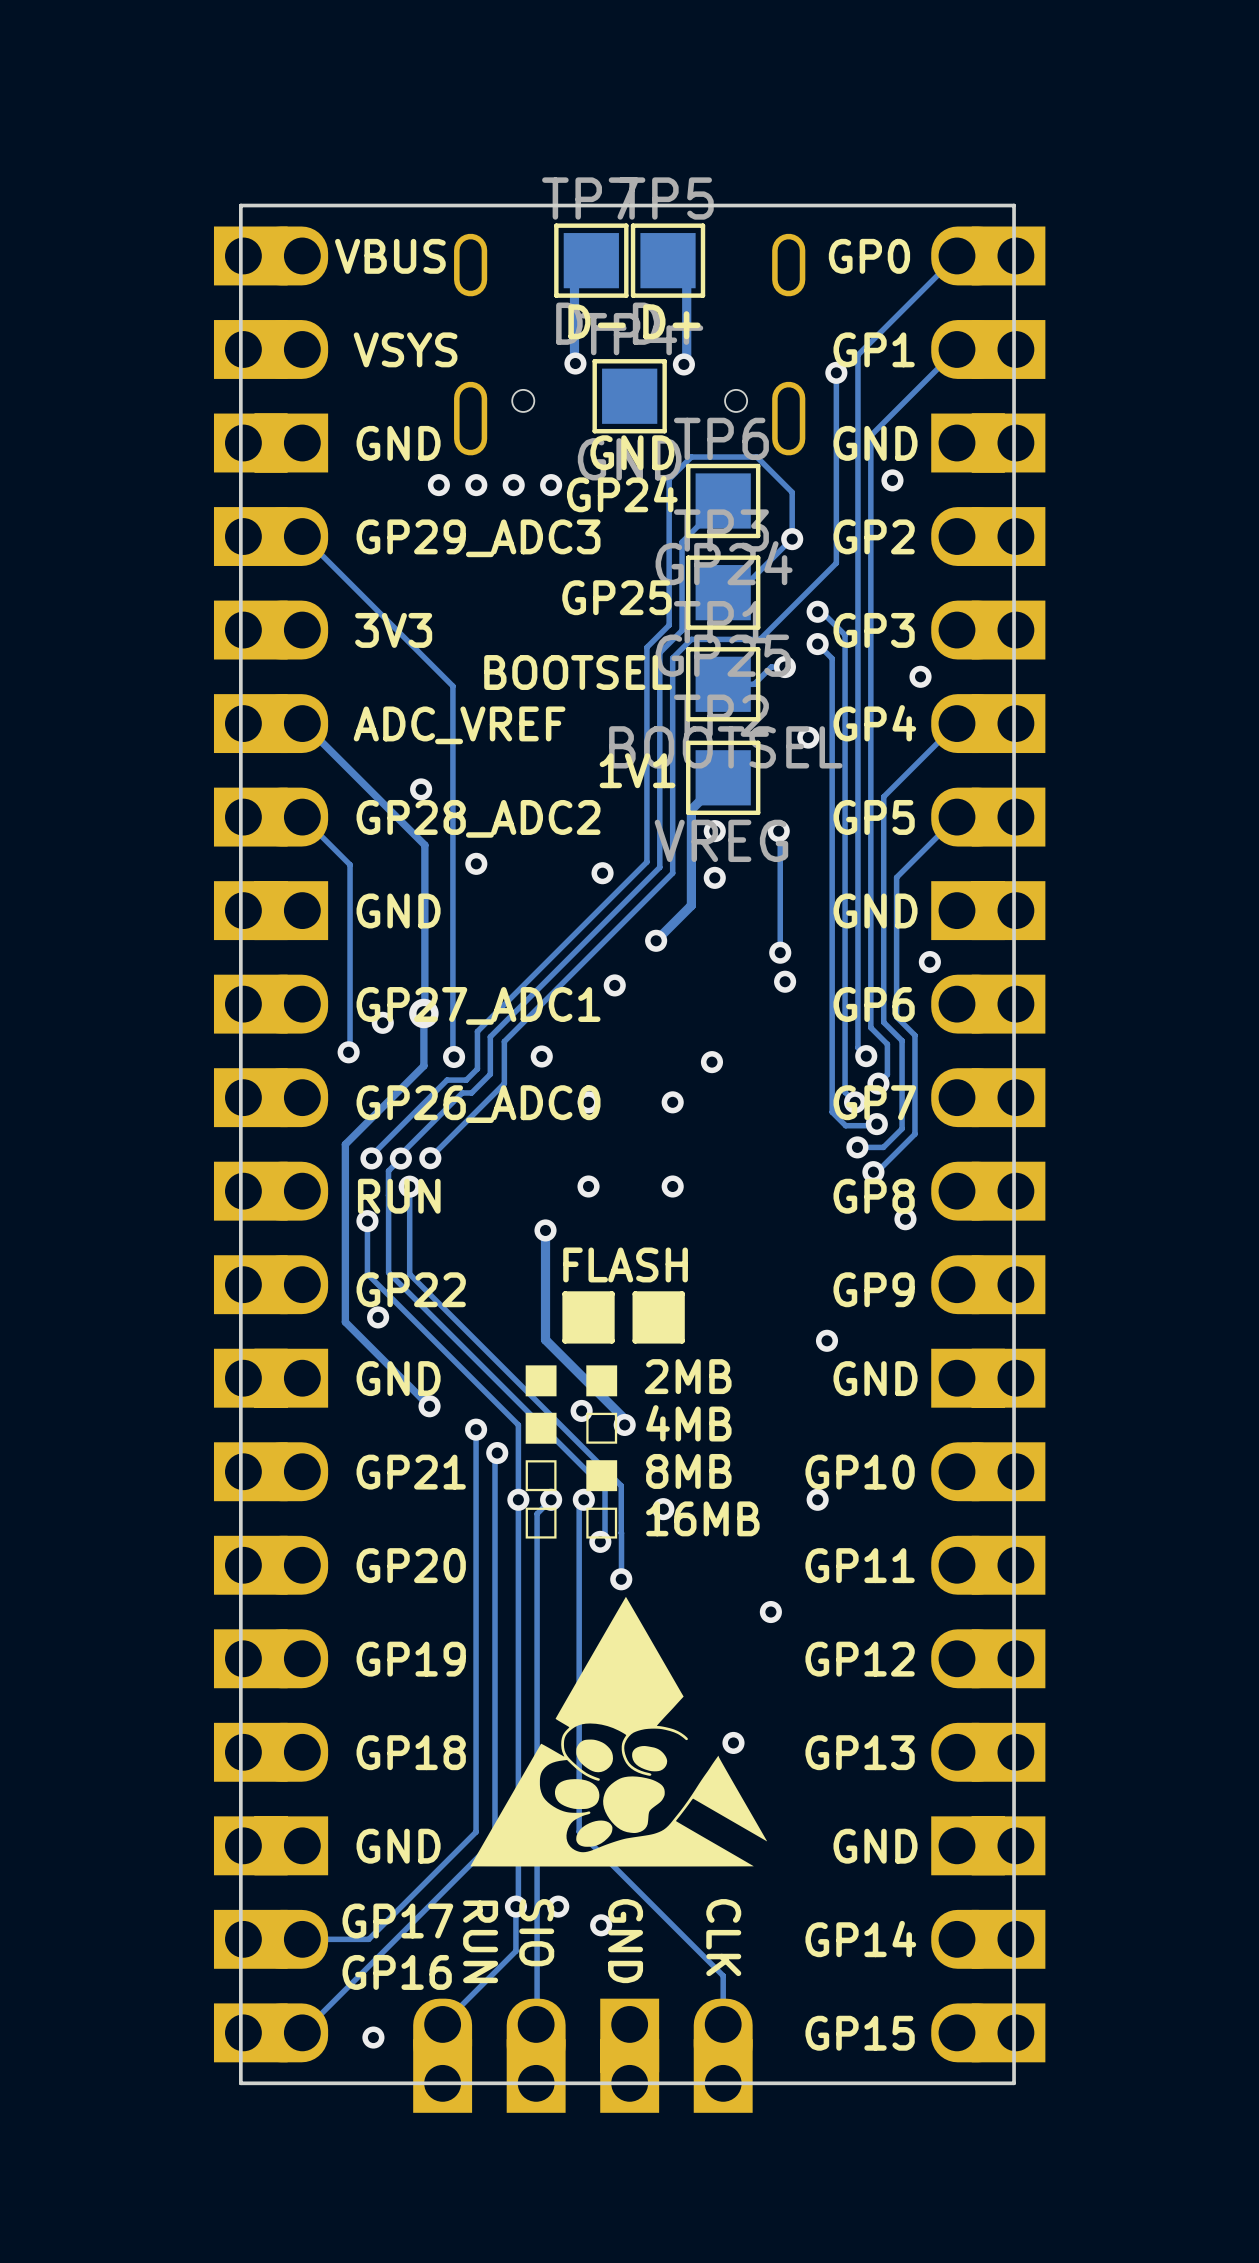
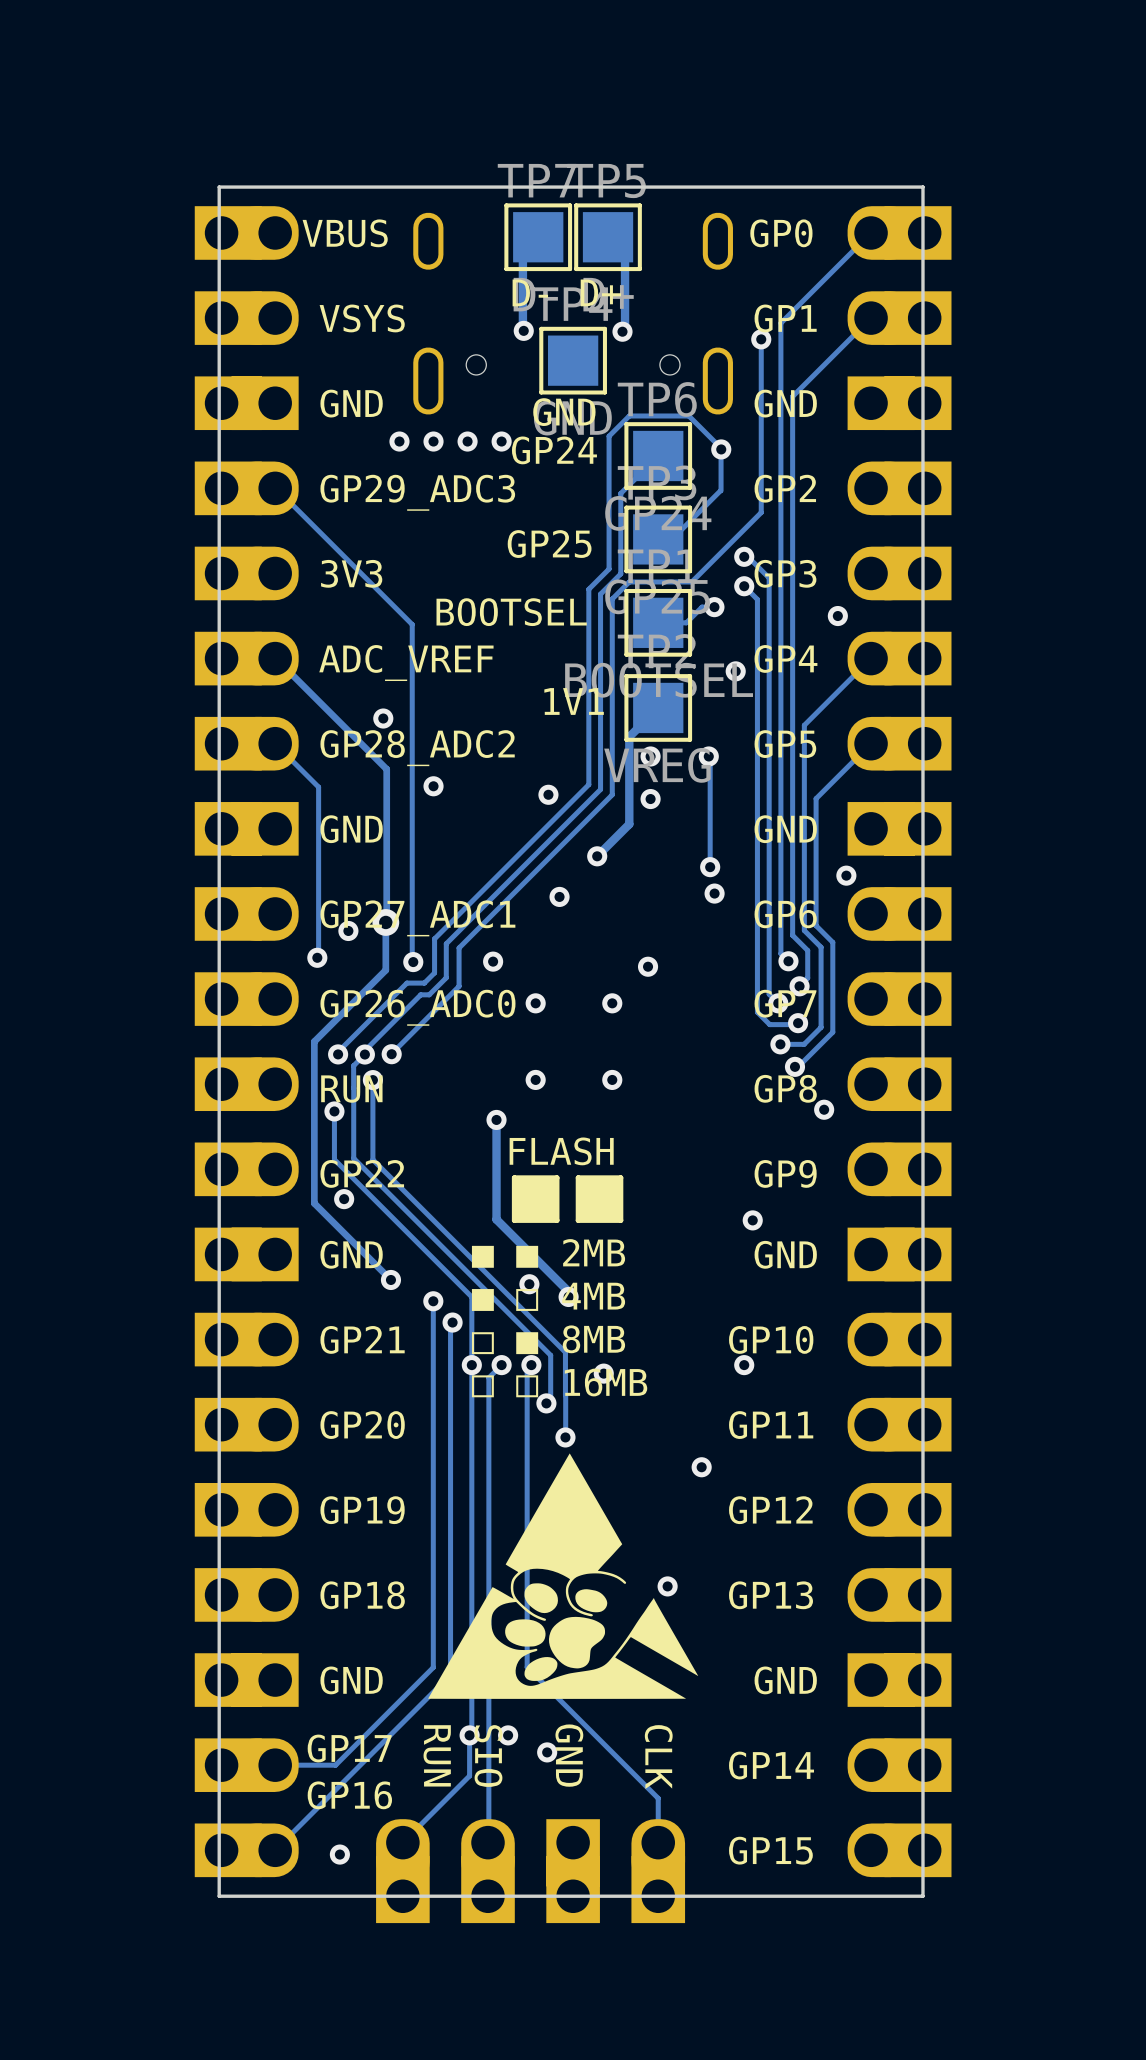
via: (892, 480) -> none
via position: (792, 539) -> (721, 449)

